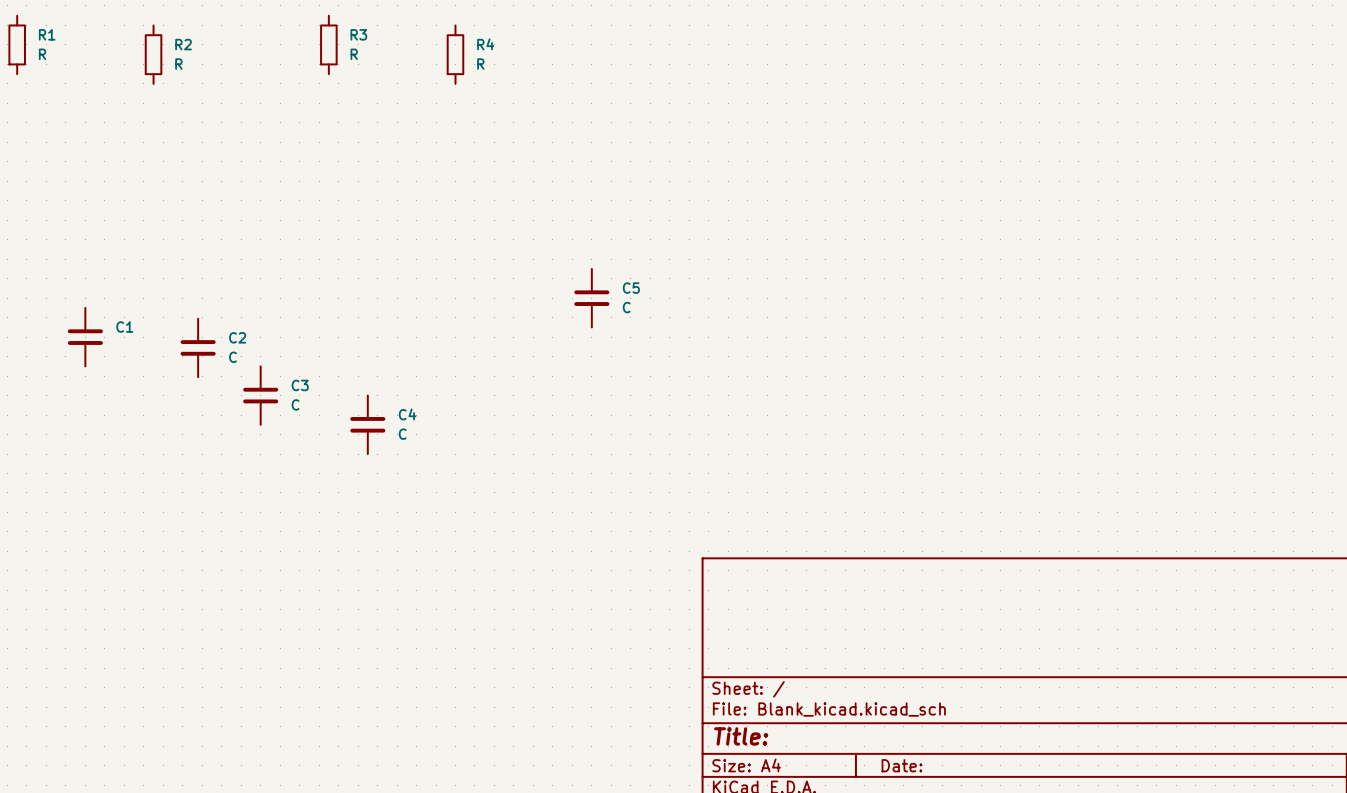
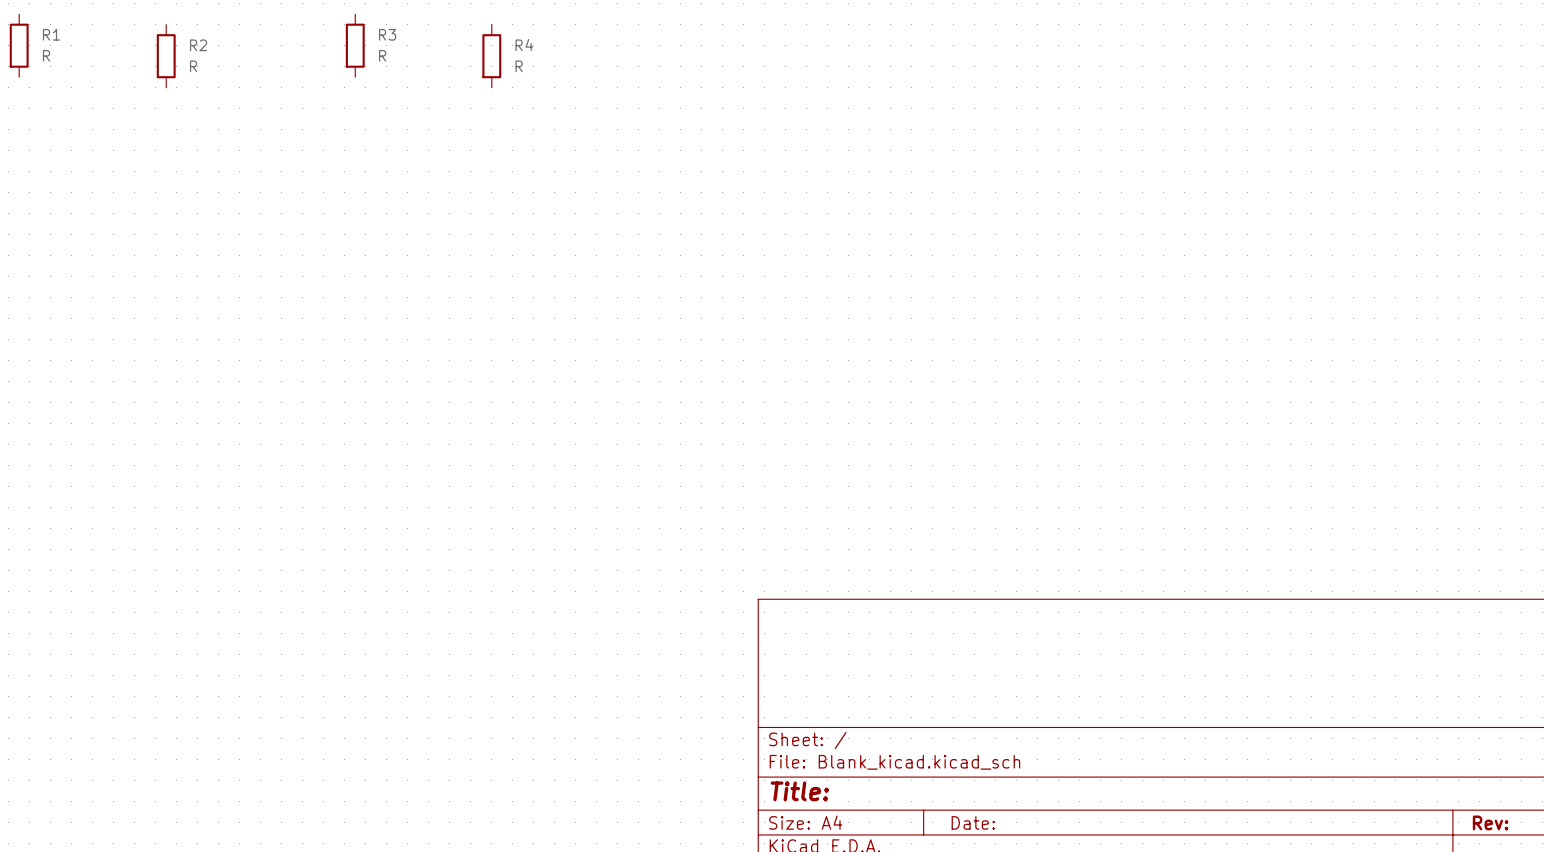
C5: C (591, 298) -> none
C1: (85, 337) -> none
C2: C (198, 347) -> none
C3: C (260, 395) -> none
C4: C (367, 424) -> none

